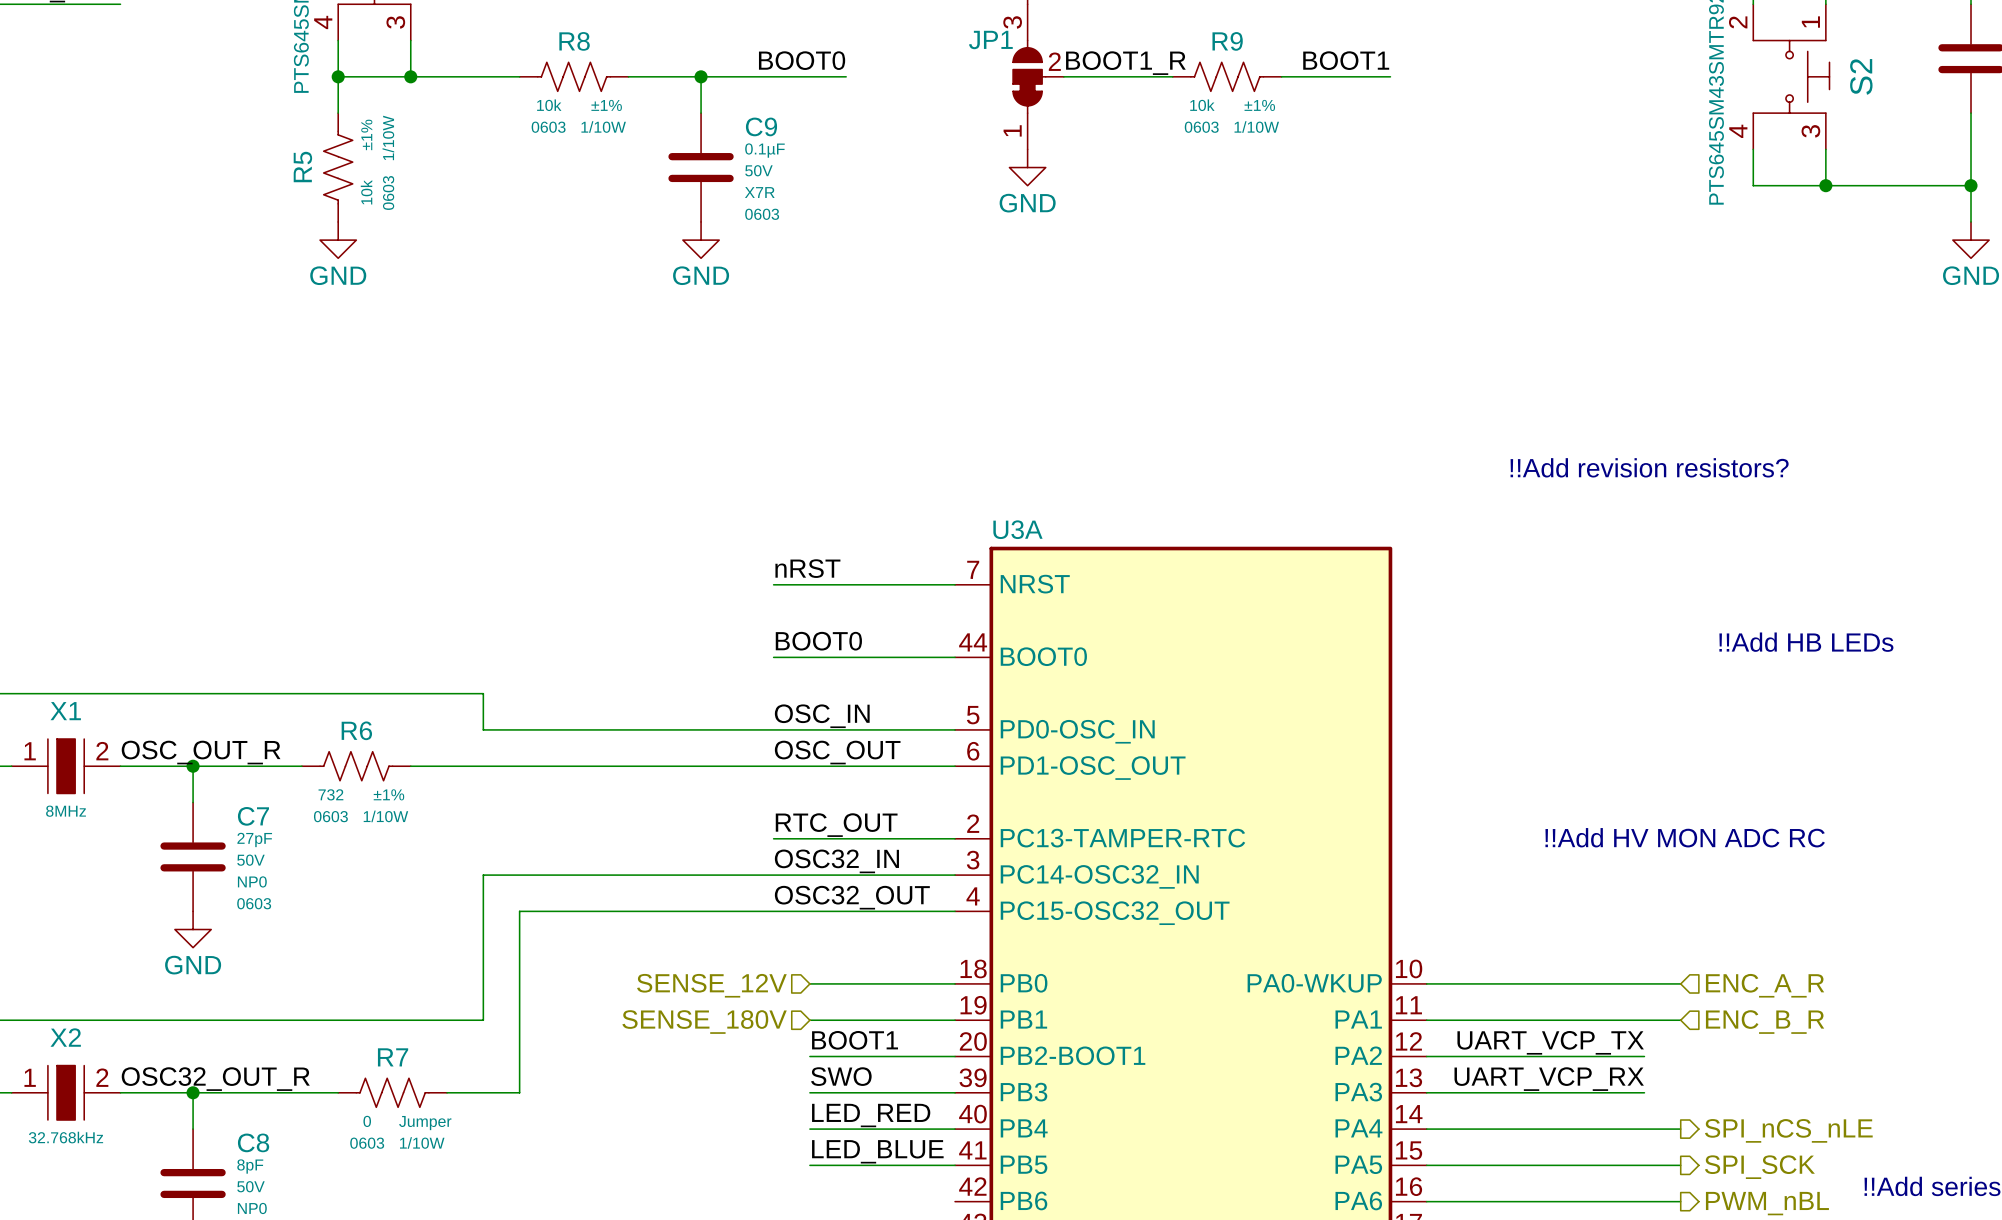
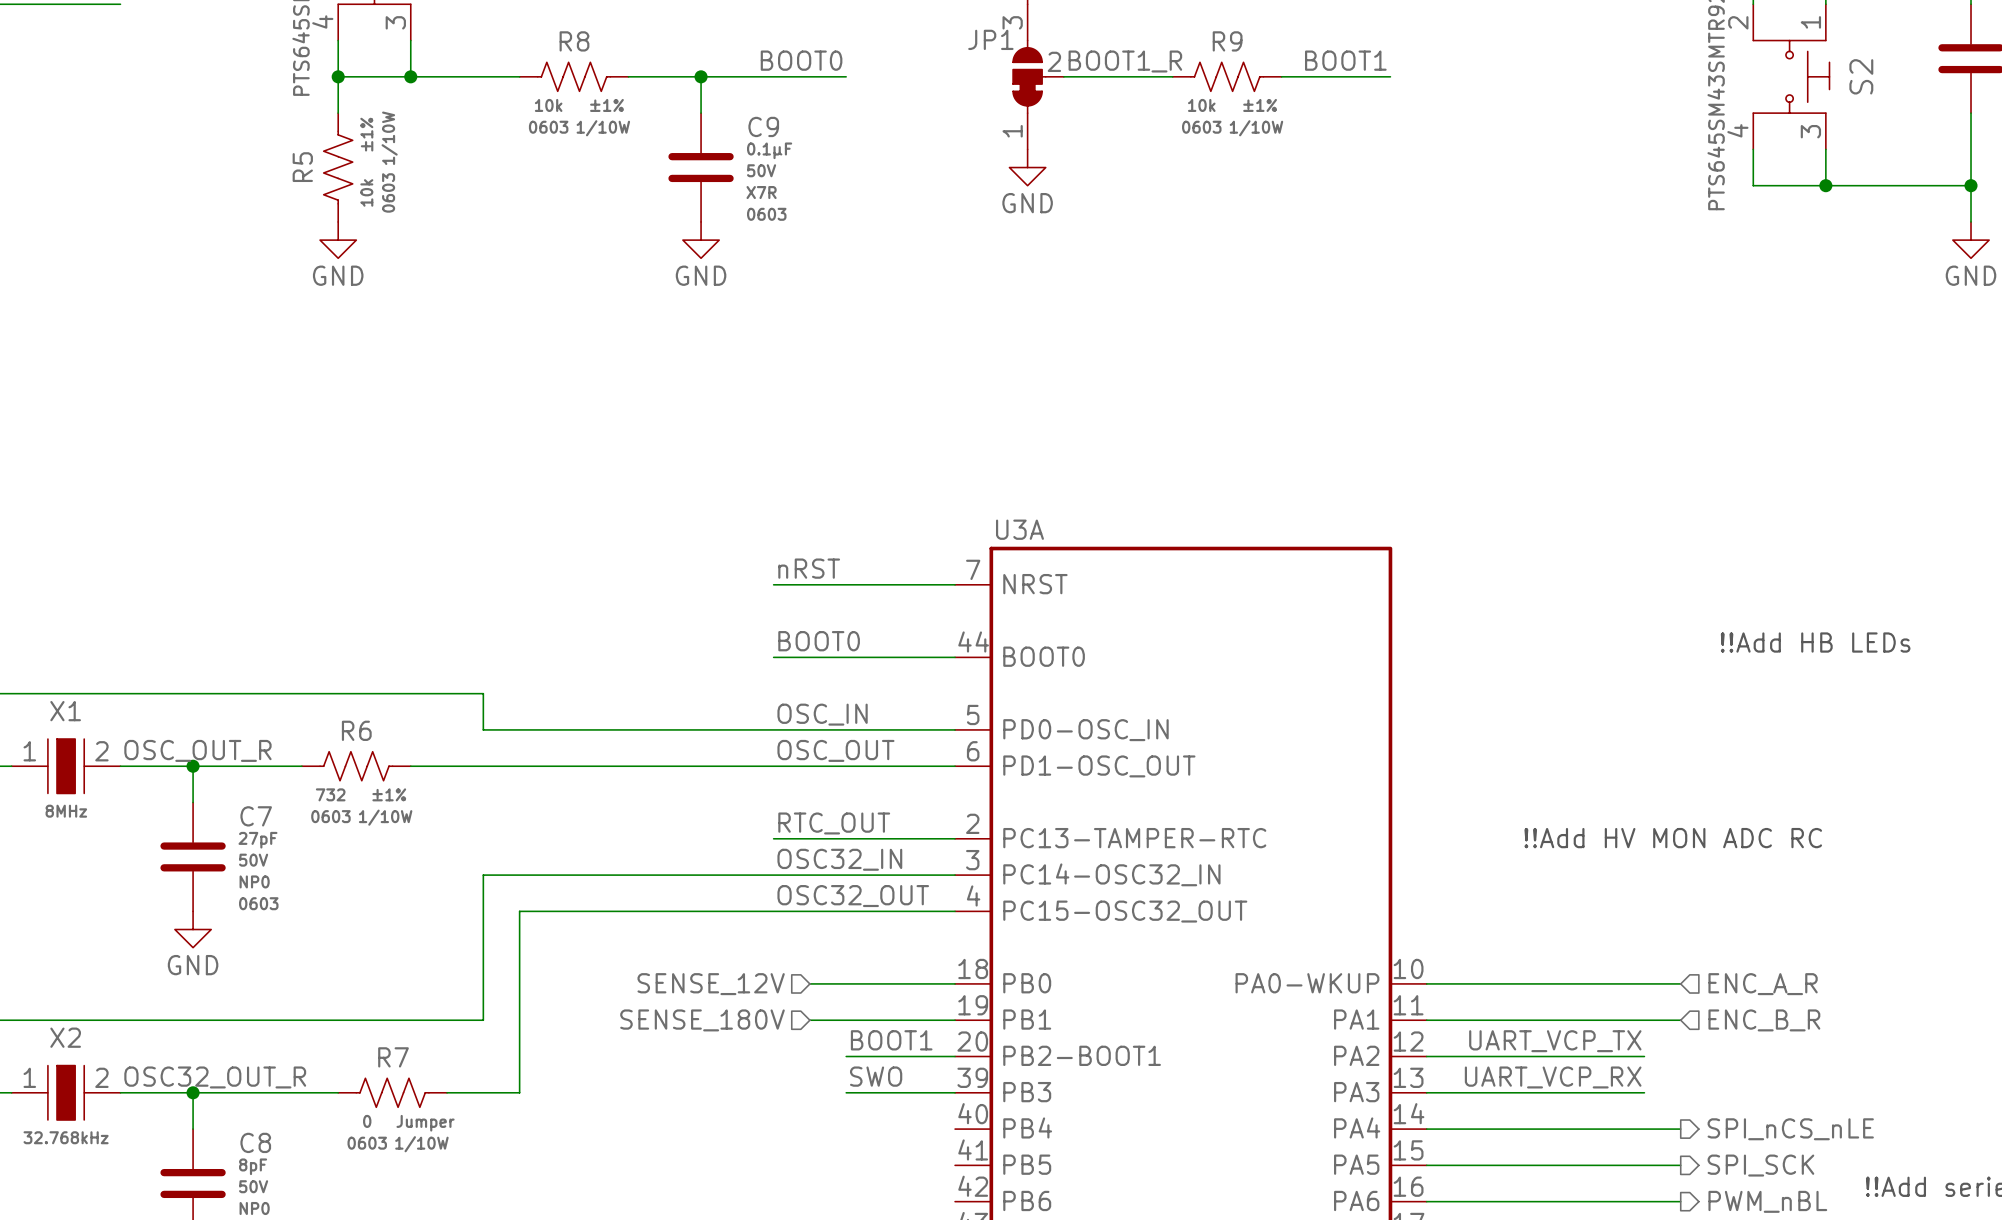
text: !!Add revision resistors? (1649, 467) -> none
label position: BOOT1 (855, 1040) -> BOOT1 (891, 1040)
wire: (809, 1056) (846, 1056) -> none
label position: SWO (841, 1076) -> SWO (876, 1076)
wire: (809, 1092) (846, 1092) -> none
label: LED_RED (871, 1115) -> none
wire: (809, 1129) (955, 1129) -> none
label: LED_BLUE (877, 1151) -> none
wire: (809, 1165) (955, 1165) -> none

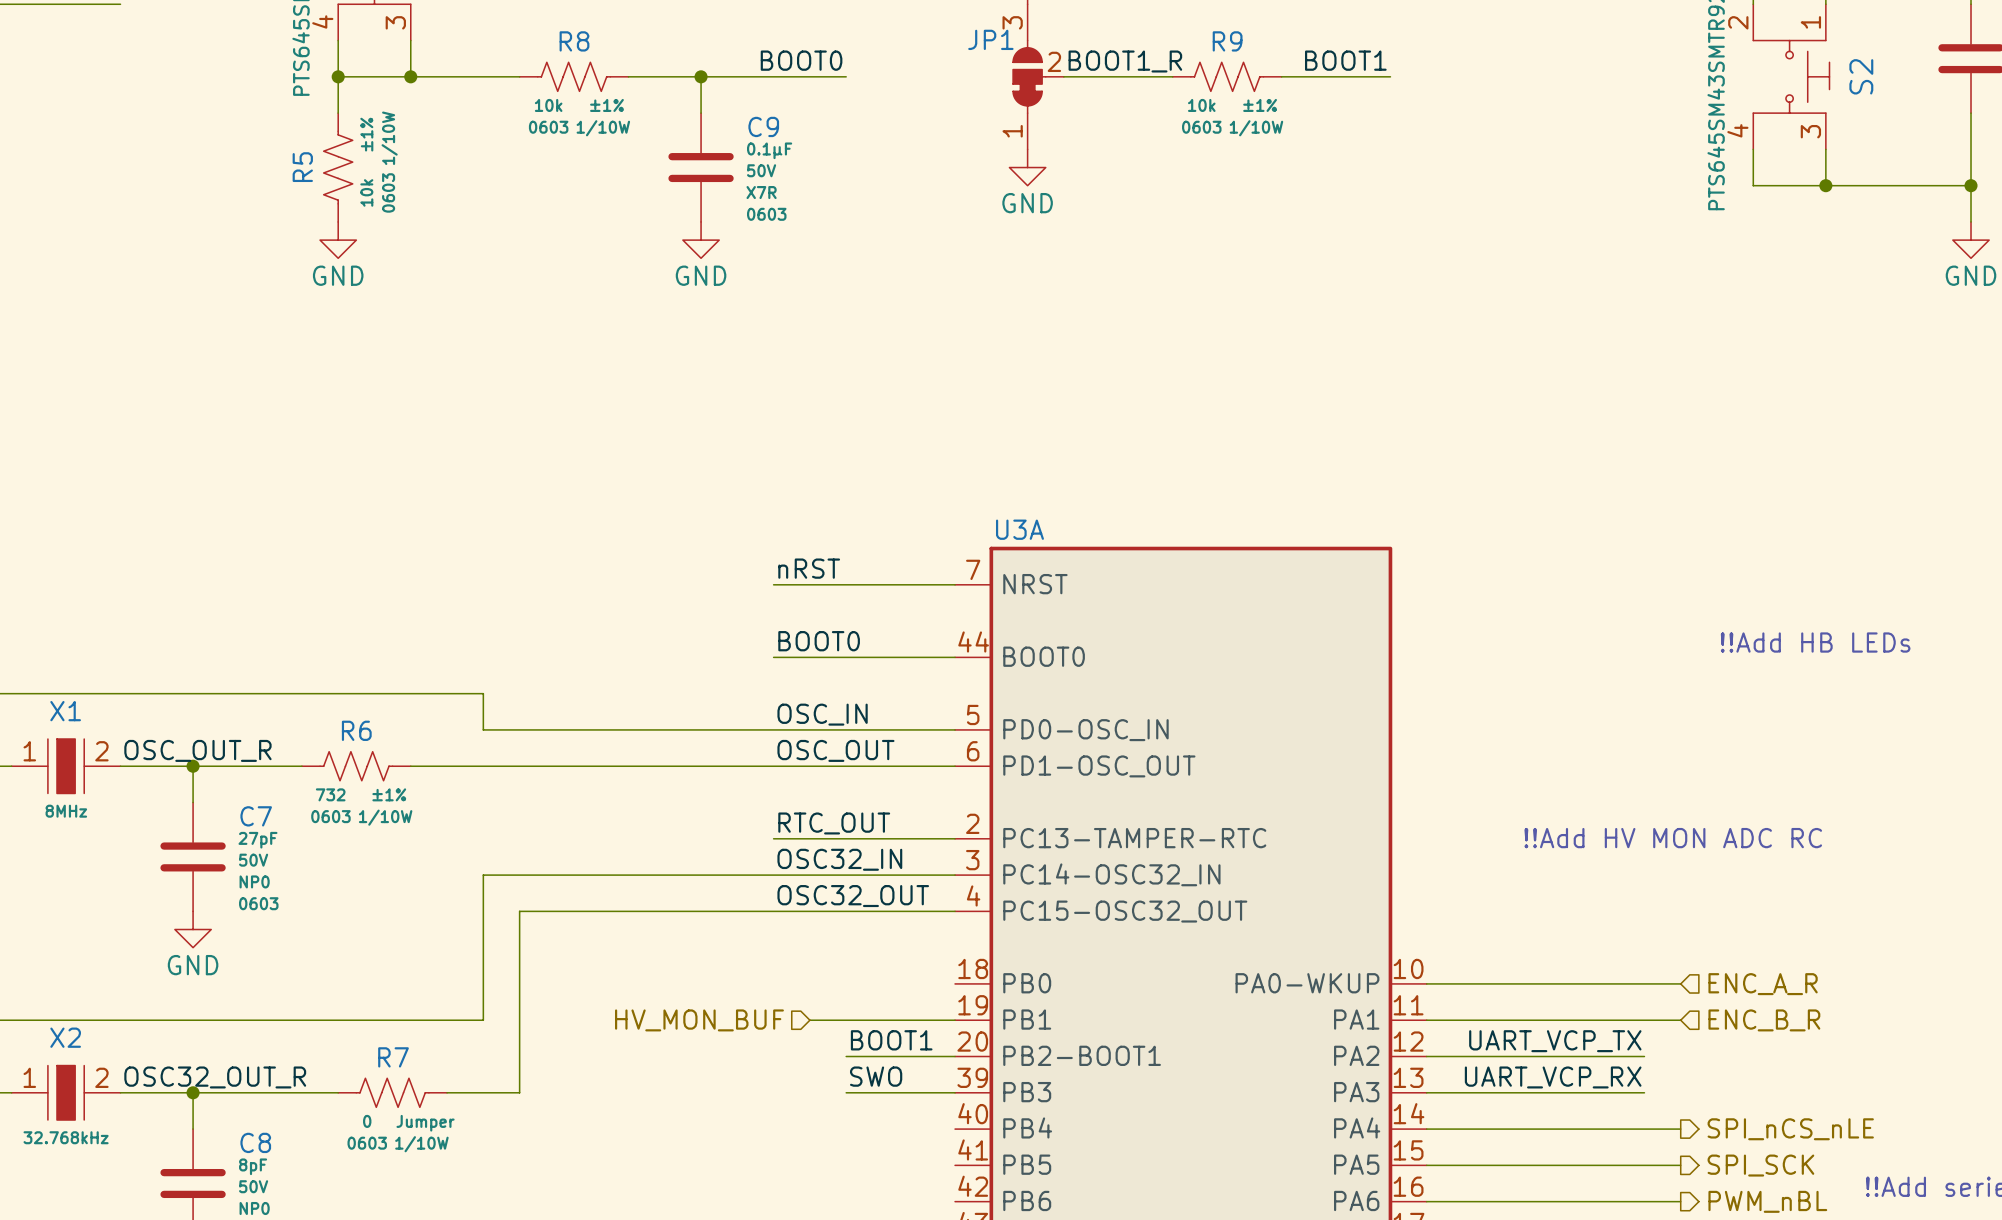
wire: (809, 983) (955, 983) -> none
hierarchical label: SENSE_12V (711, 984) -> none
hierarchical label: SENSE_180V (702, 1020) -> HV_MON_BUF (699, 1020)

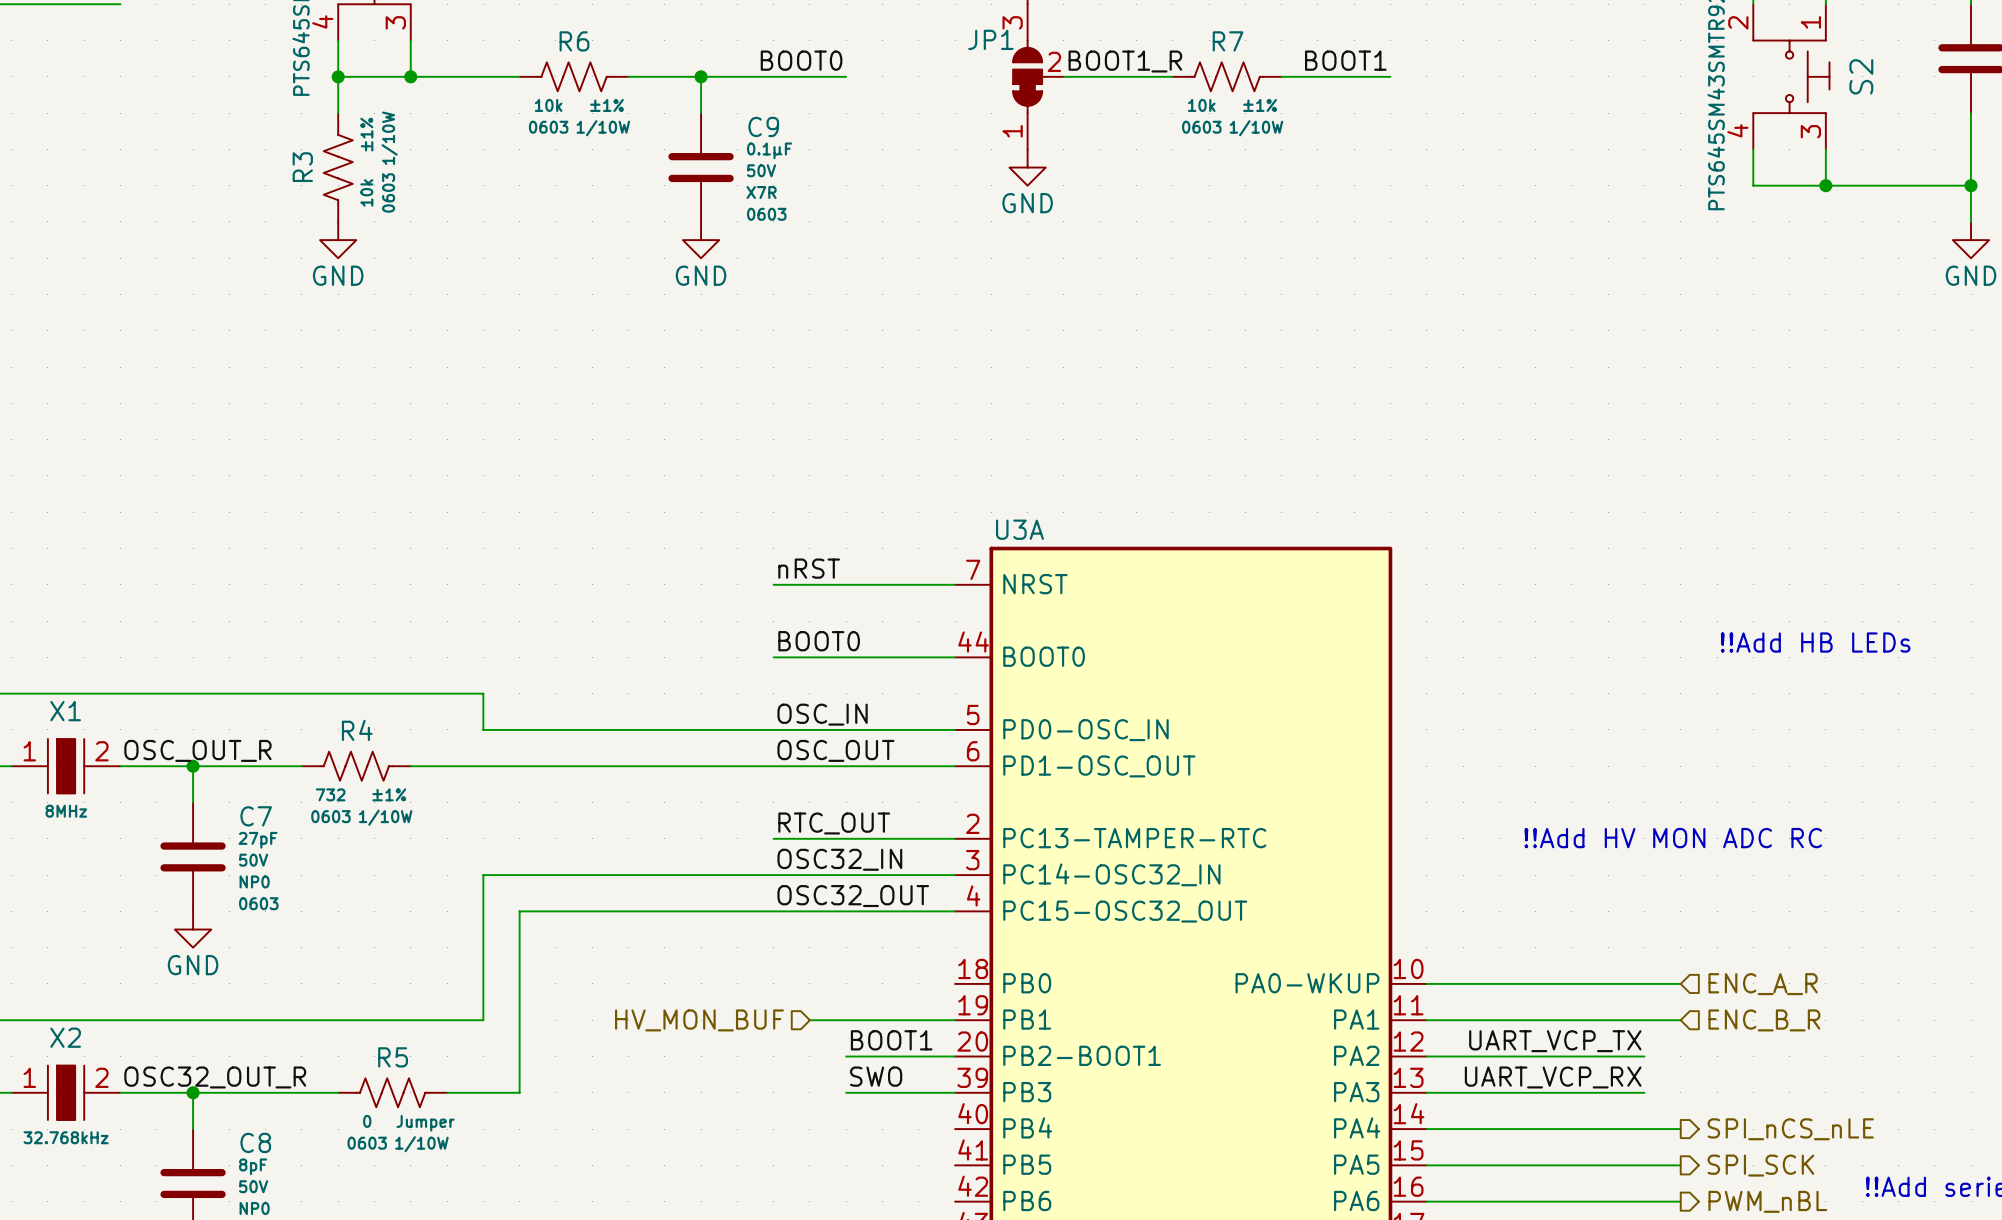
R8 name: R8 (574, 41) -> R6 (574, 41)
R9 name: R9 (1227, 41) -> R7 (1228, 41)
R5 name: R5 (302, 167) -> R3 (302, 167)
R6 name: R6 (356, 730) -> R4 (357, 730)
R7 name: R7 (393, 1057) -> R5 (393, 1057)

